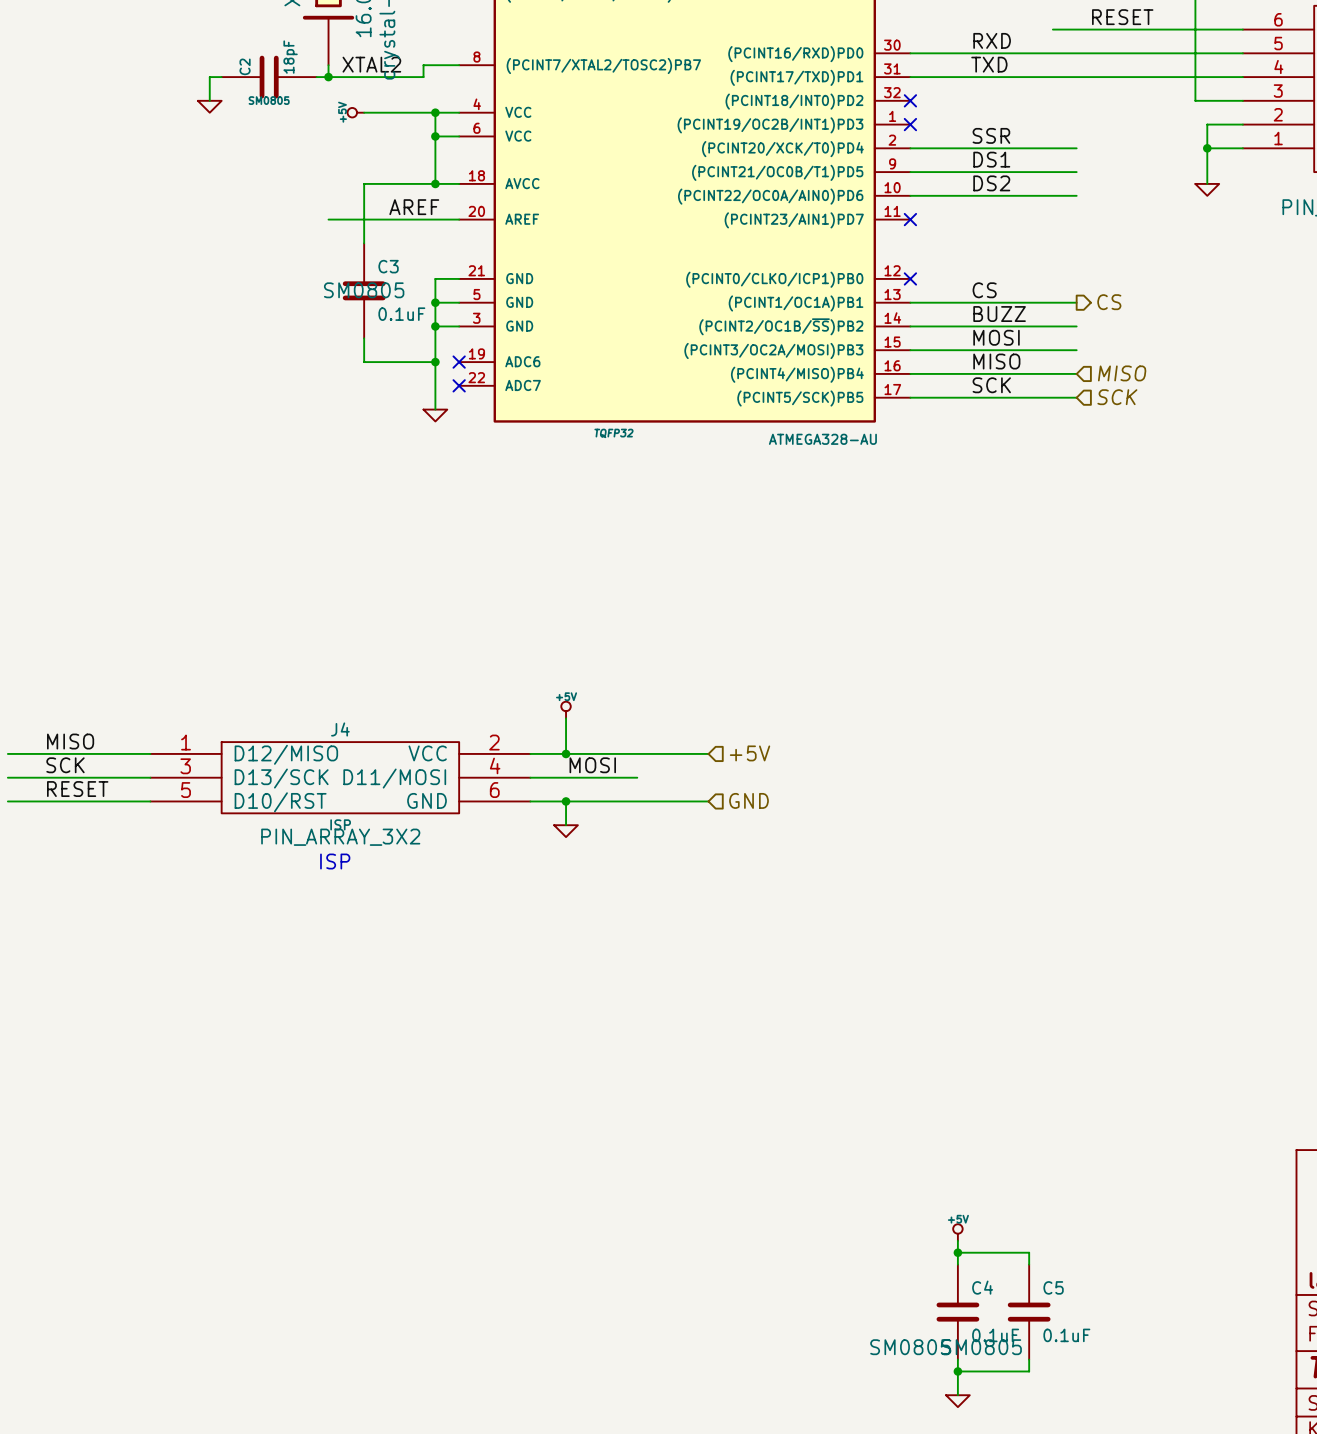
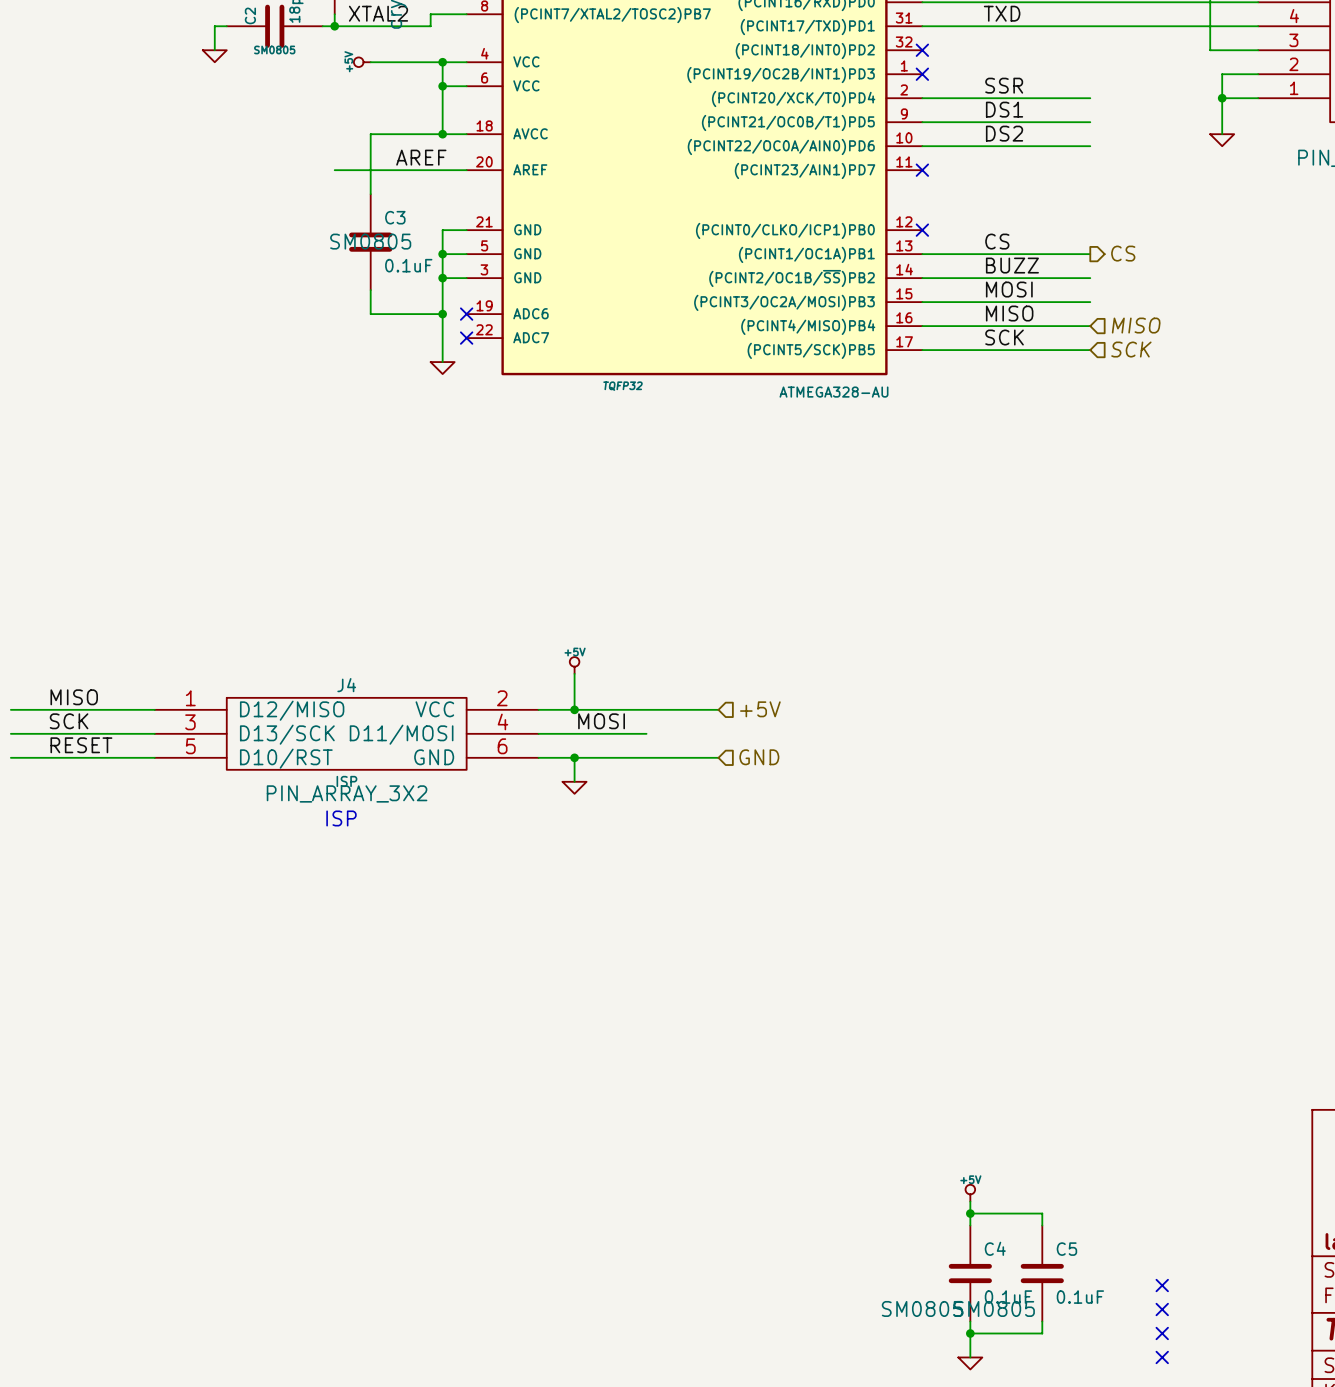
no-connect mark: none -> (1162, 1285)
no-connect mark: none -> (1162, 1309)
no-connect mark: none -> (1162, 1333)
no-connect mark: none -> (1162, 1357)

